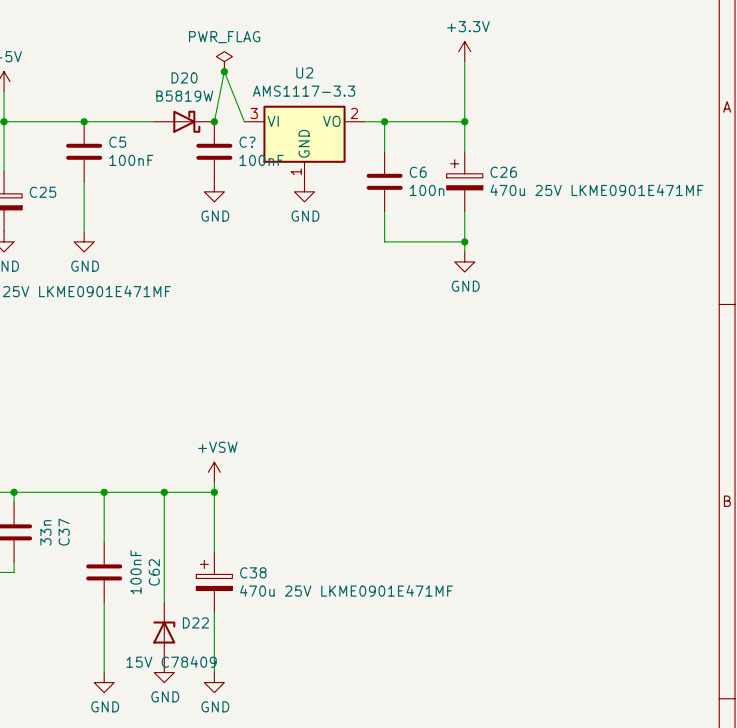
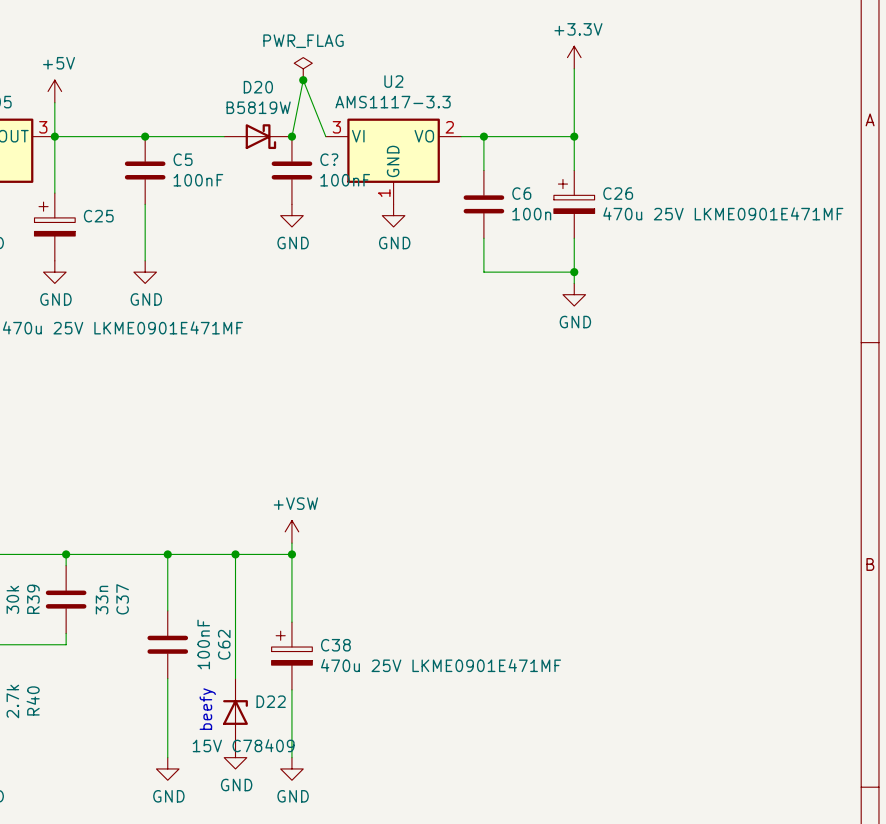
text: none -> beefy (207, 709)

